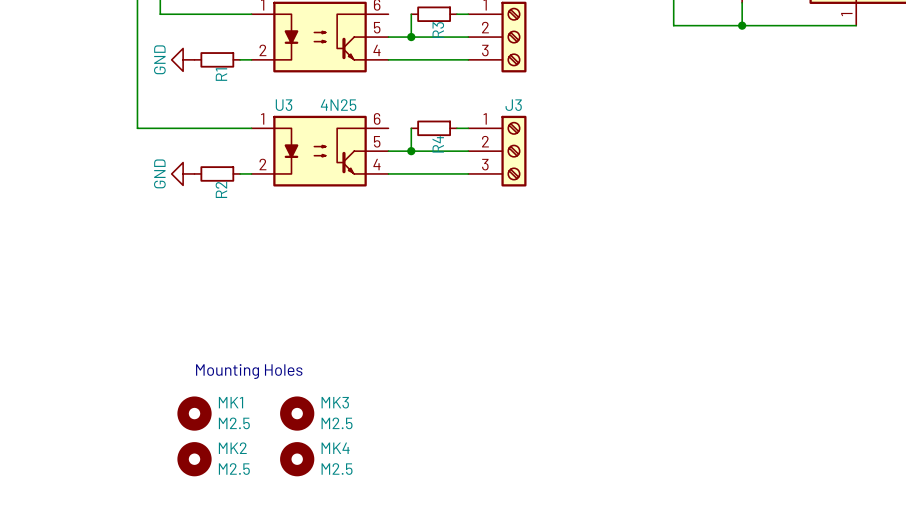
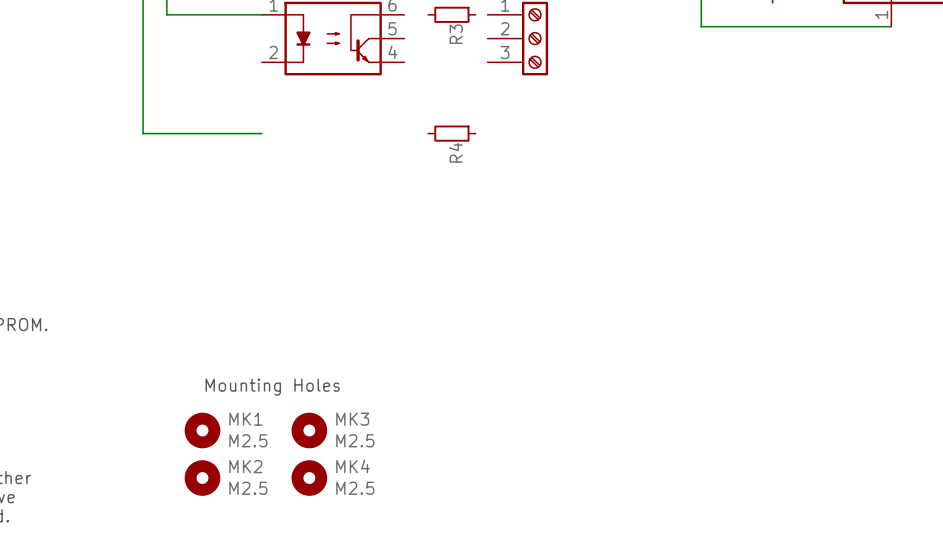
wire: (742, 2) (742, 25) -> none
wire: (411, 14) (411, 37) -> none
wire: (456, 14) (468, 14) -> none
junction: (742, 25) -> none
wire: (388, 37) (468, 37) -> none
junction: (411, 37) -> none
power symbol: GND (183, 59) -> none
R1: (217, 59) -> none
wire: (240, 59) (251, 59) -> none
wire: (388, 59) (468, 59) -> none
wire: (411, 128) (411, 151) -> none
wire: (456, 128) (468, 128) -> none
U3: 4N25 (320, 151) -> none
wire: (388, 151) (468, 151) -> none
junction: (411, 151) -> none
J3: (497, 151) -> none
power symbol: GND (183, 173) -> none
R2: (217, 173) -> none
wire: (240, 173) (251, 173) -> none
wire: (388, 173) (468, 173) -> none

